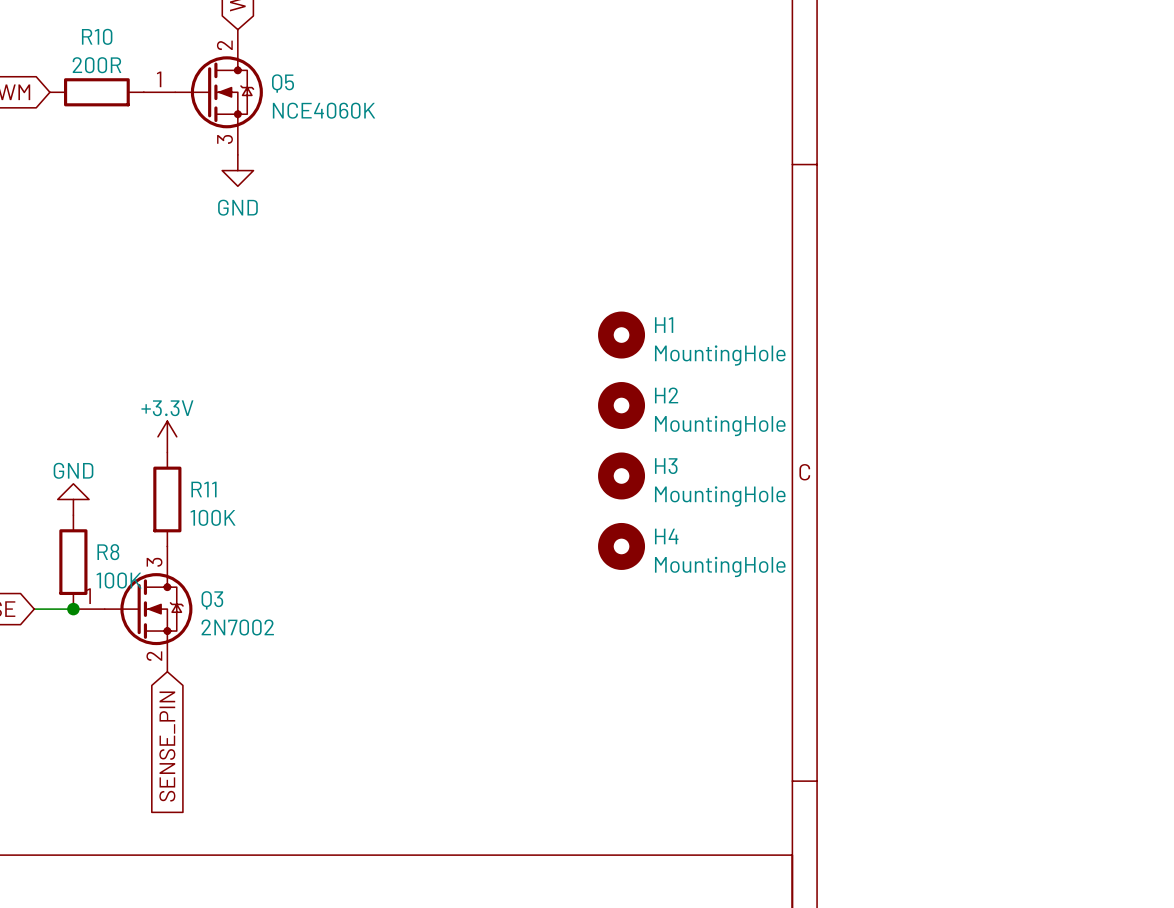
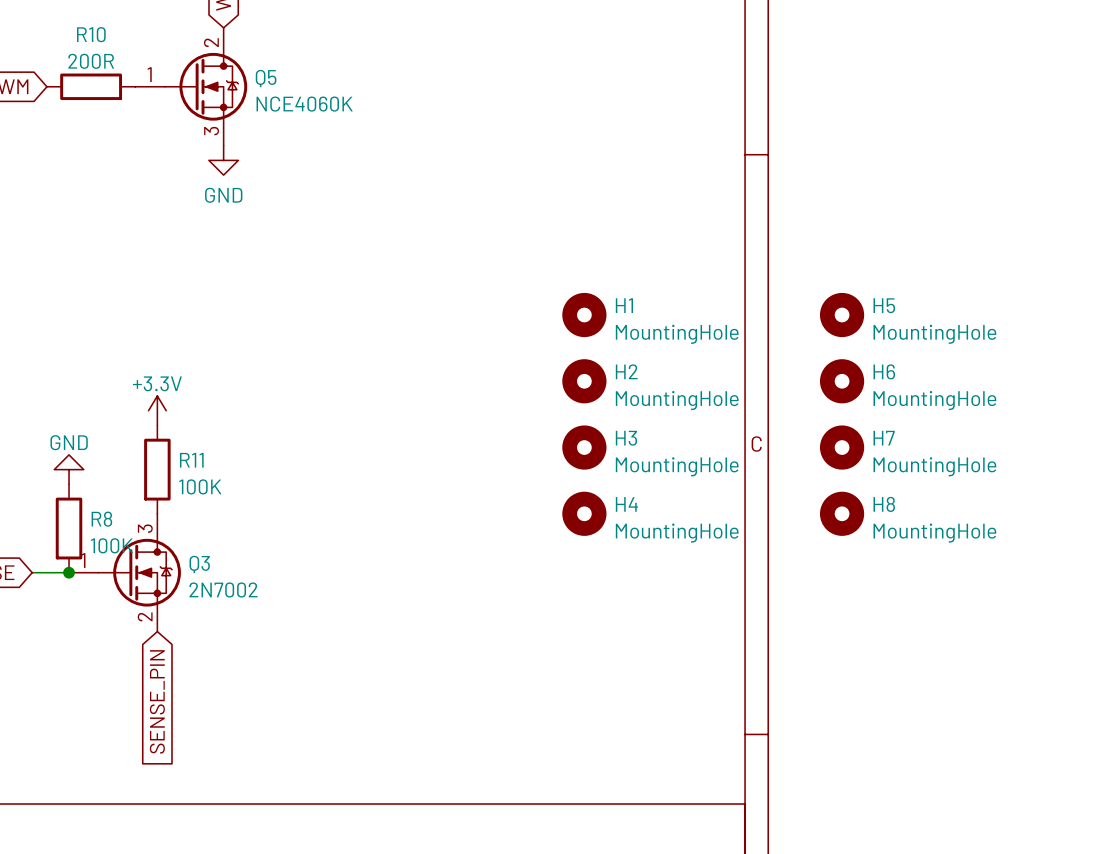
H5: none -> MountingHole (842, 315)
H6: none -> MountingHole (842, 381)
H7: none -> MountingHole (842, 447)
H8: none -> MountingHole (842, 513)

